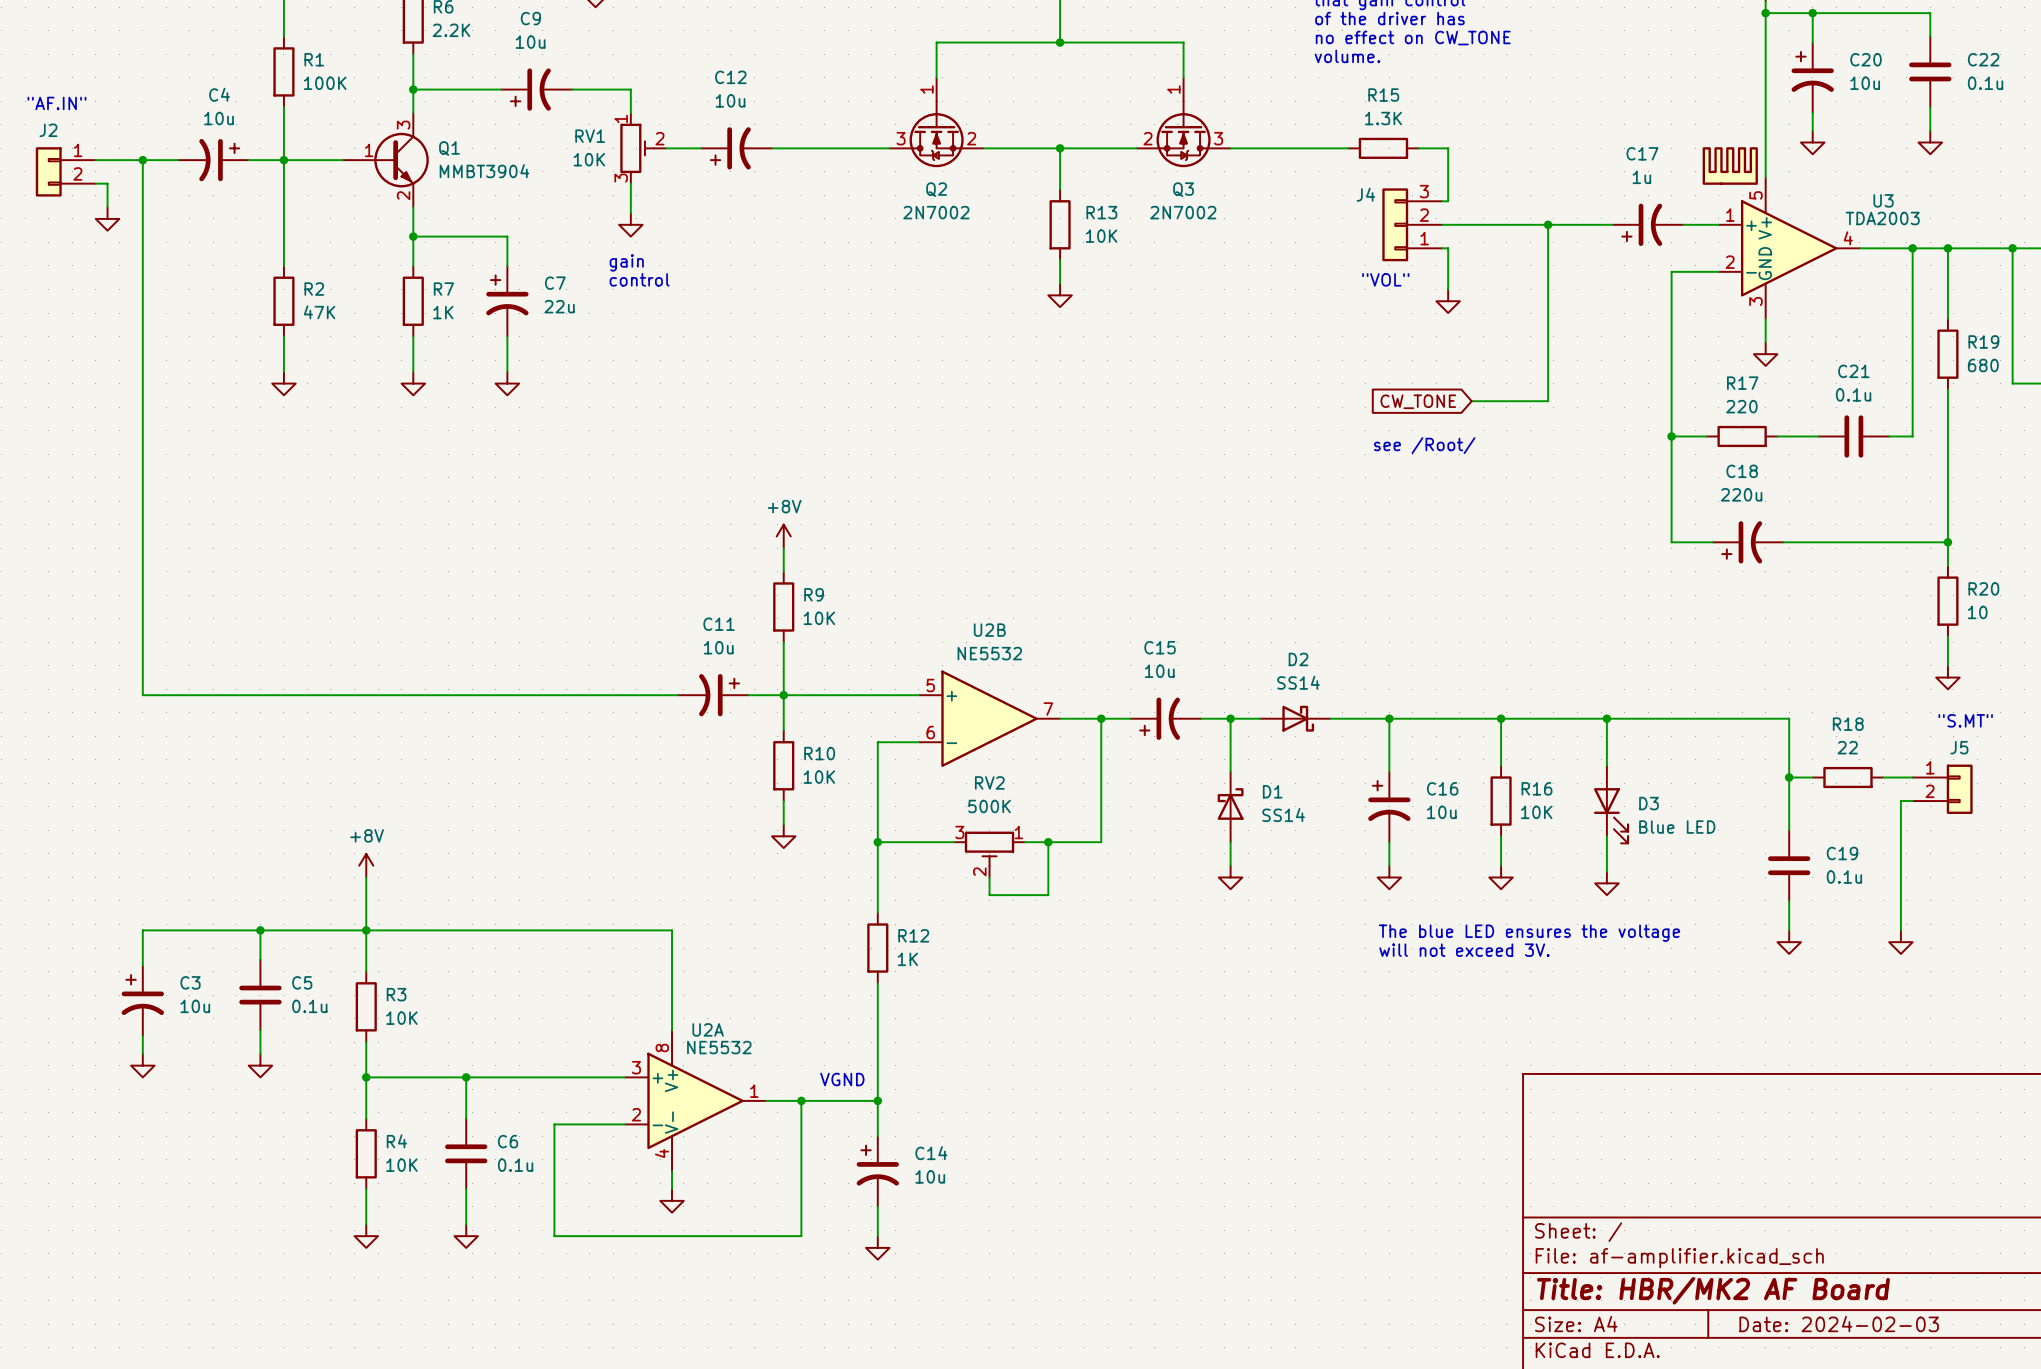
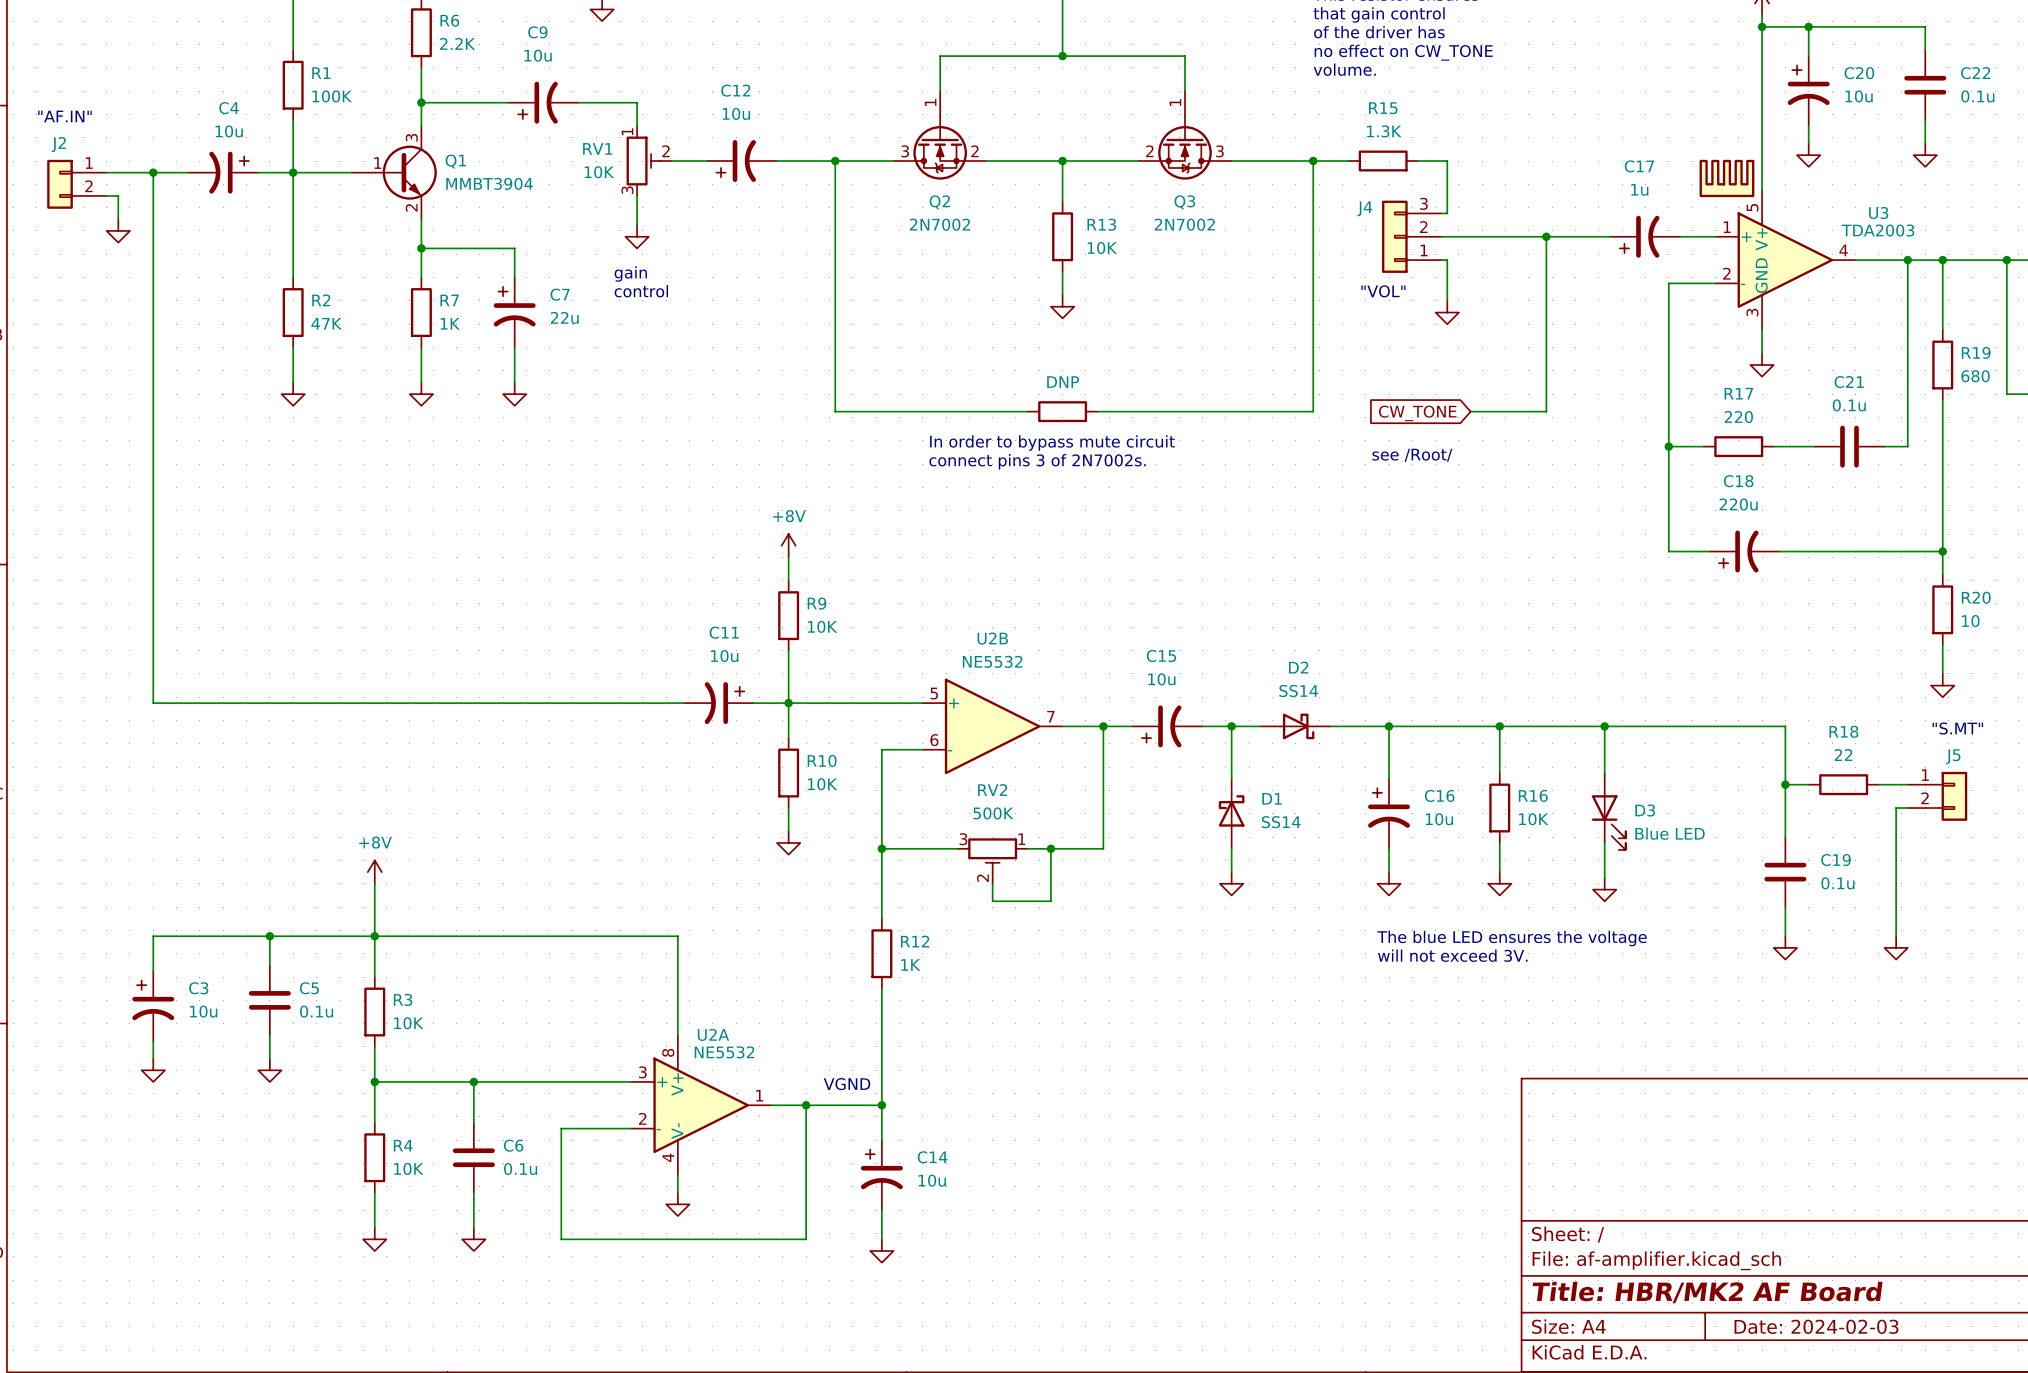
wire: none -> (835, 161) (835, 411) (1027, 411)
junction: none -> (835, 161)
wire: none -> (1313, 161) (1313, 411) (1097, 411)
junction: none -> (1313, 161)
part: none -> DNP (1062, 411)
text: none -> In order to bypass mute circuit (1052, 443)
text: none -> connect pins 3 of 2N7002s. (1037, 461)

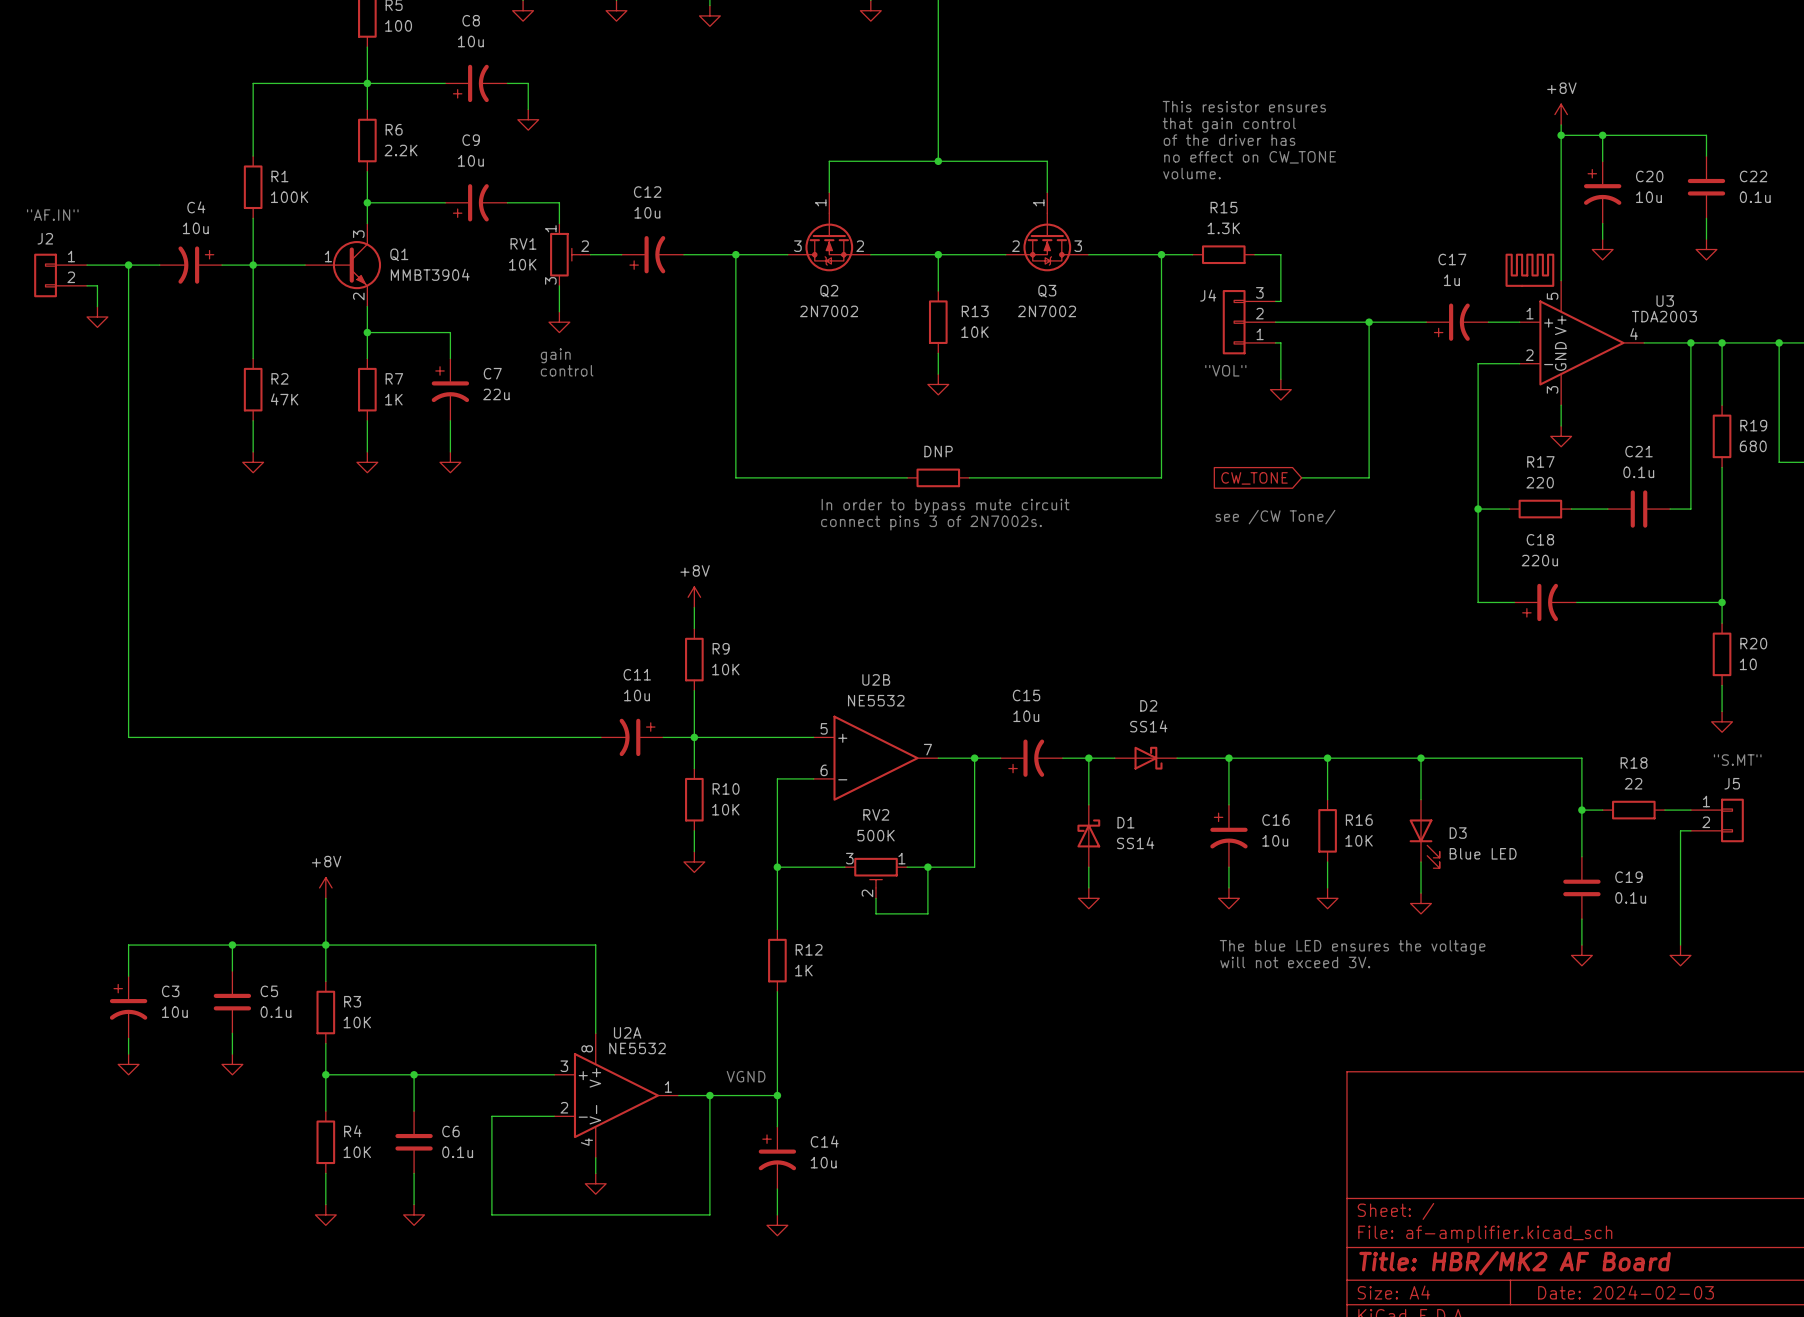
text: see /Root/ (1412, 455) -> see /CW Tone/ (1275, 517)

